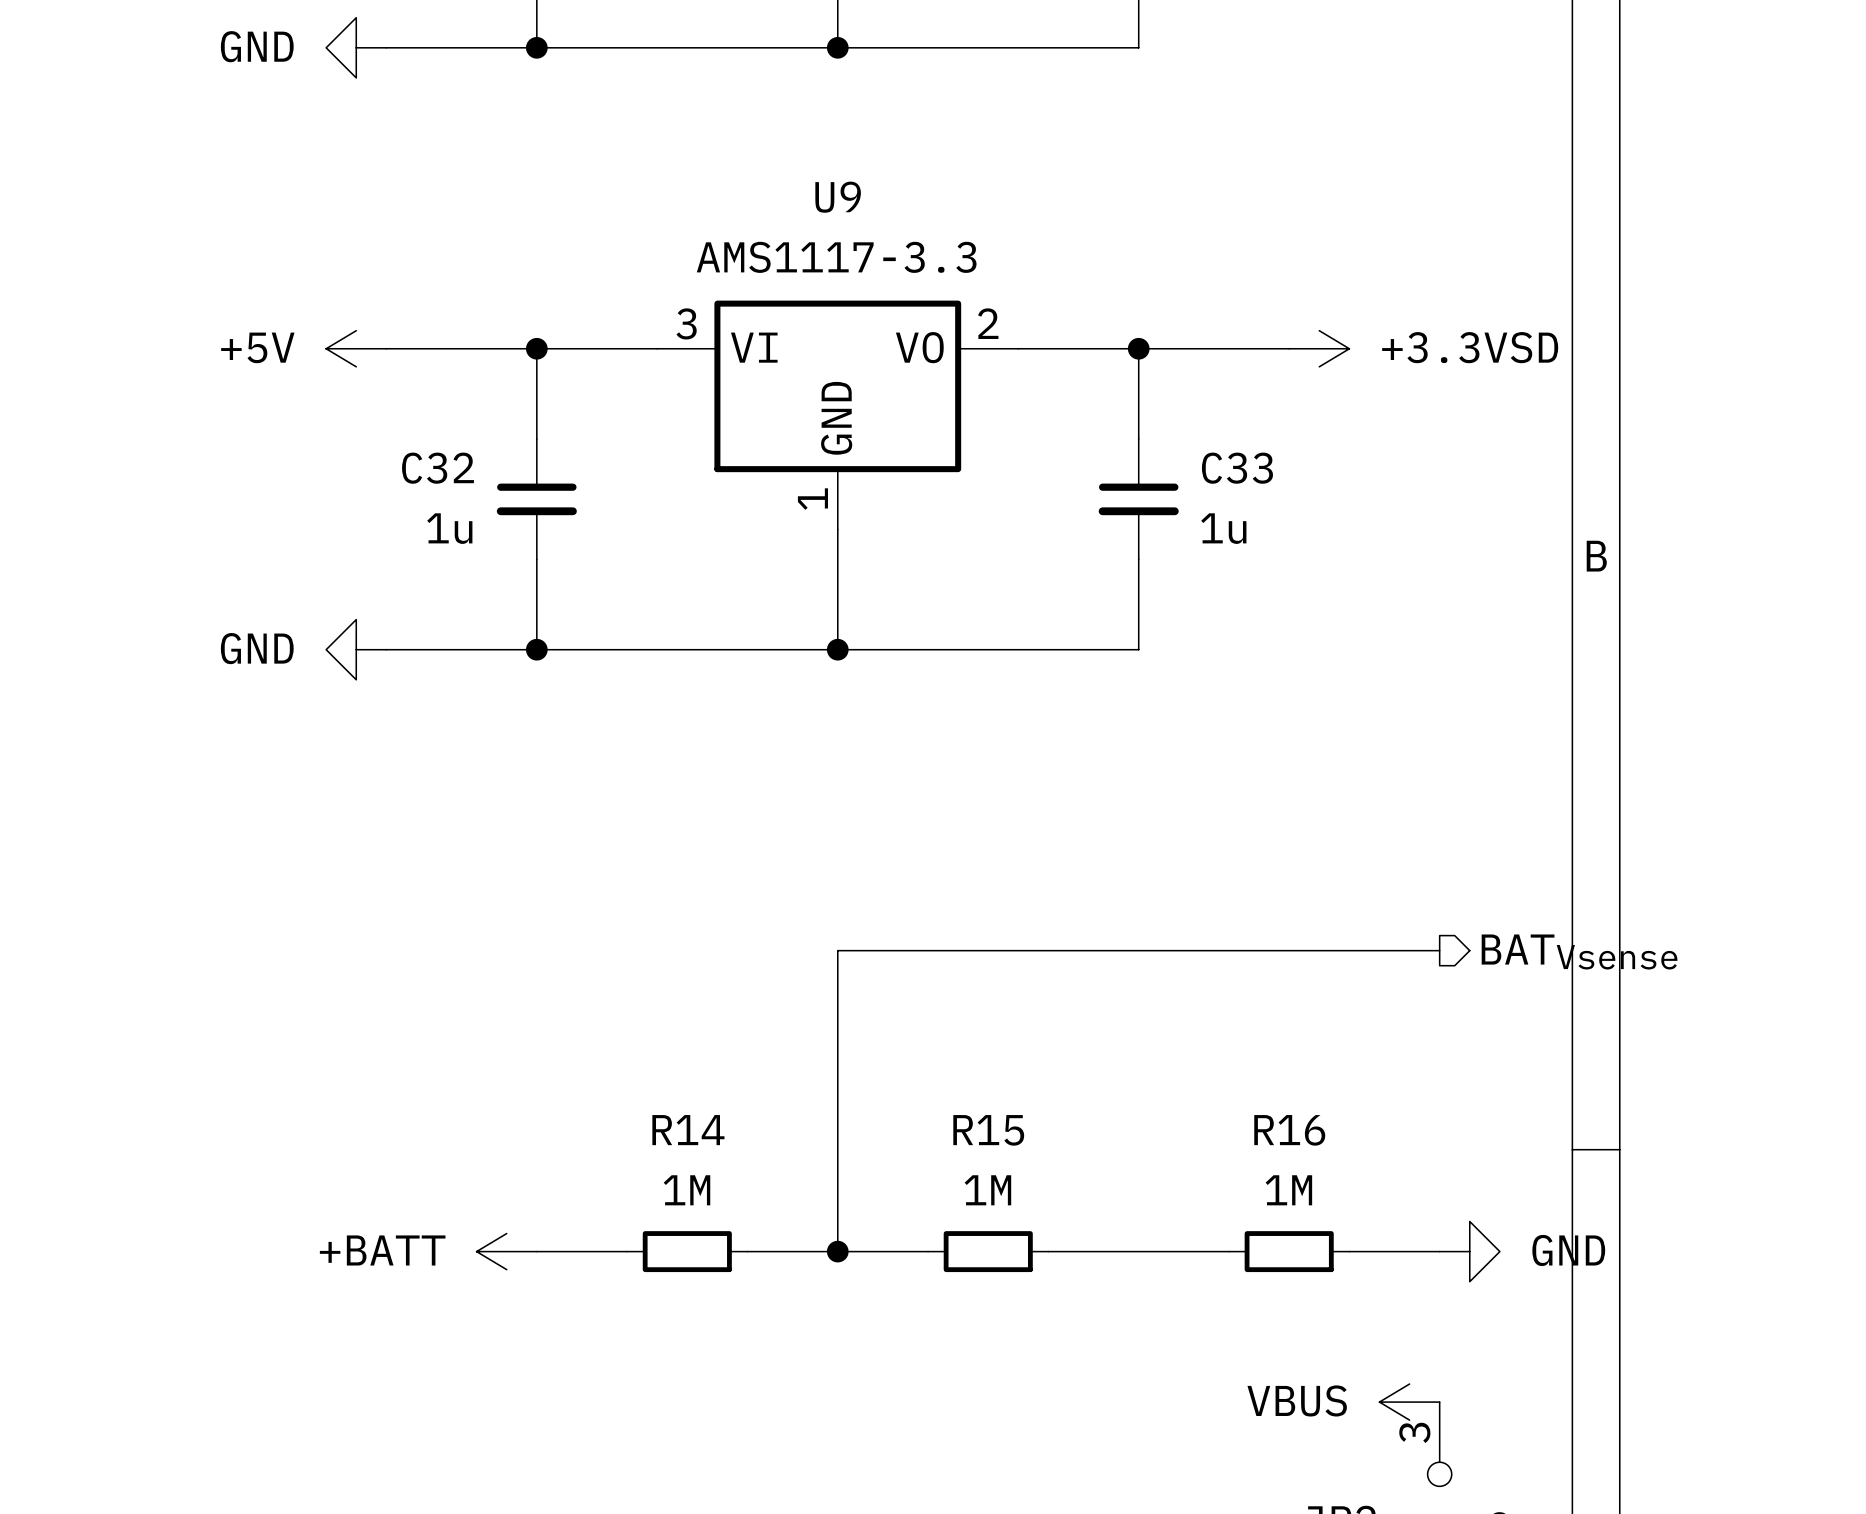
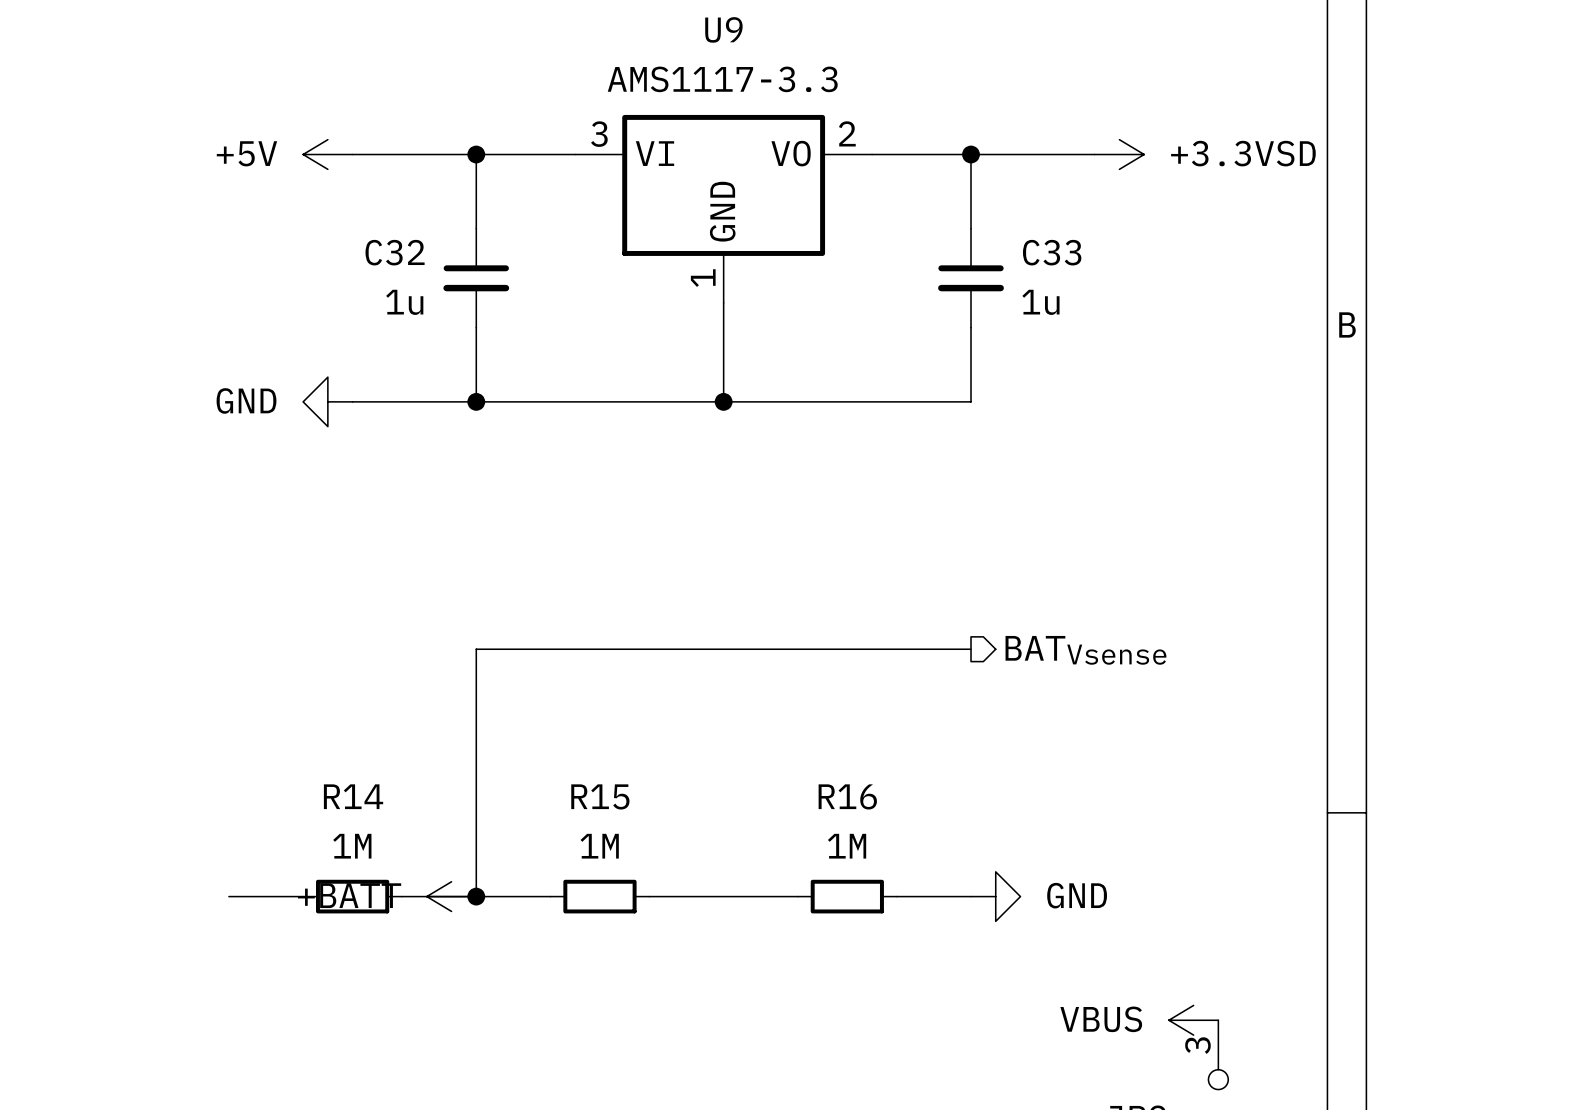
wire: (837, 950) (837, 1251) -> (723, 649) (476, 649) (476, 896) (402, 896)
wire: (1138, 950) (1439, 950) -> none
hierarchical label position: BATVsense (1579, 951) -> BATVsense (1085, 650)
R14 name: R14 (688, 1130) -> R15 (600, 796)
R15 name: R15 (988, 1130) -> R16 (847, 796)
wire: none -> (228, 896) (303, 896)
R14: none -> 1M (352, 896)
junction: none -> (476, 896)
junction: (837, 1251) -> none
wire: (1138, 1251) (1229, 1251) -> none
R16: 1M (1289, 1251) -> none
wire: (1349, 1251) (1439, 1251) -> none
power symbol position: GND (1469, 1251) -> GND (995, 896)

